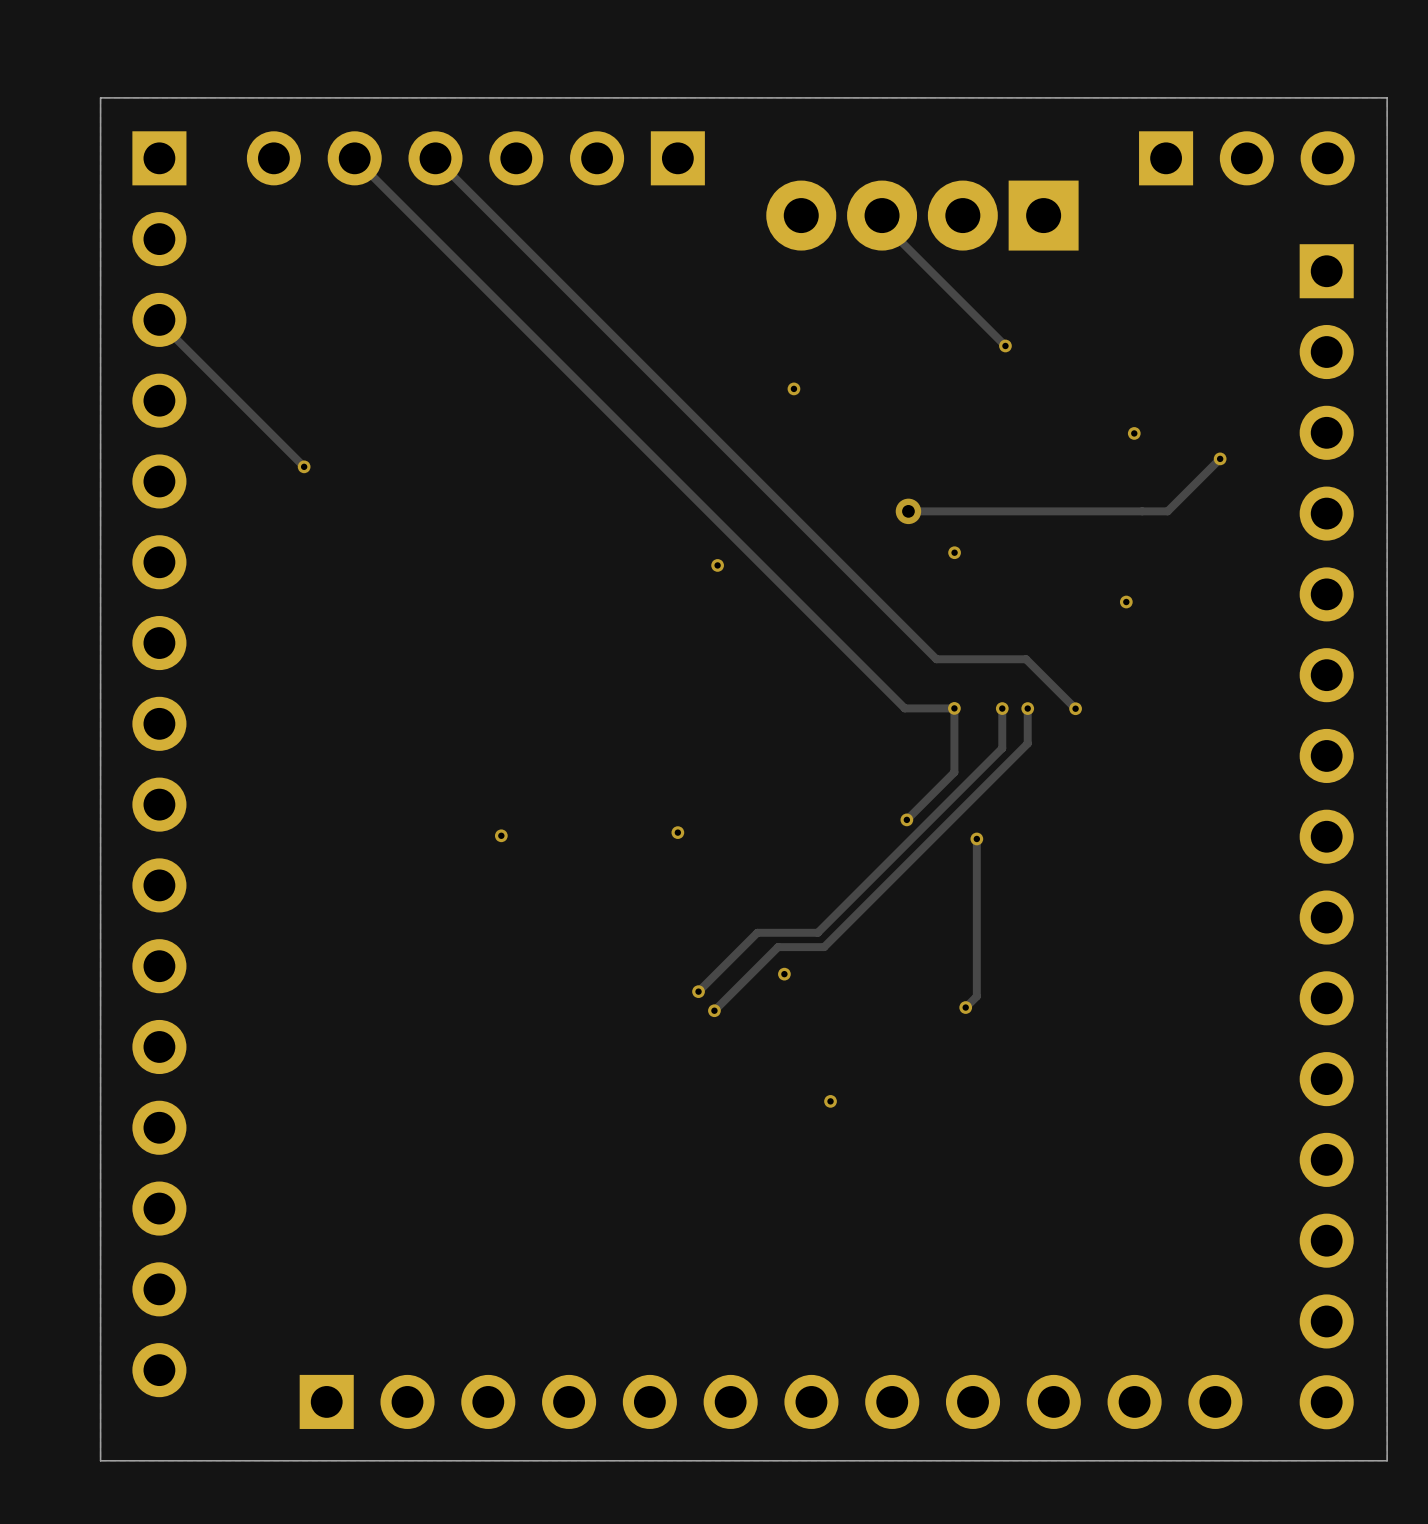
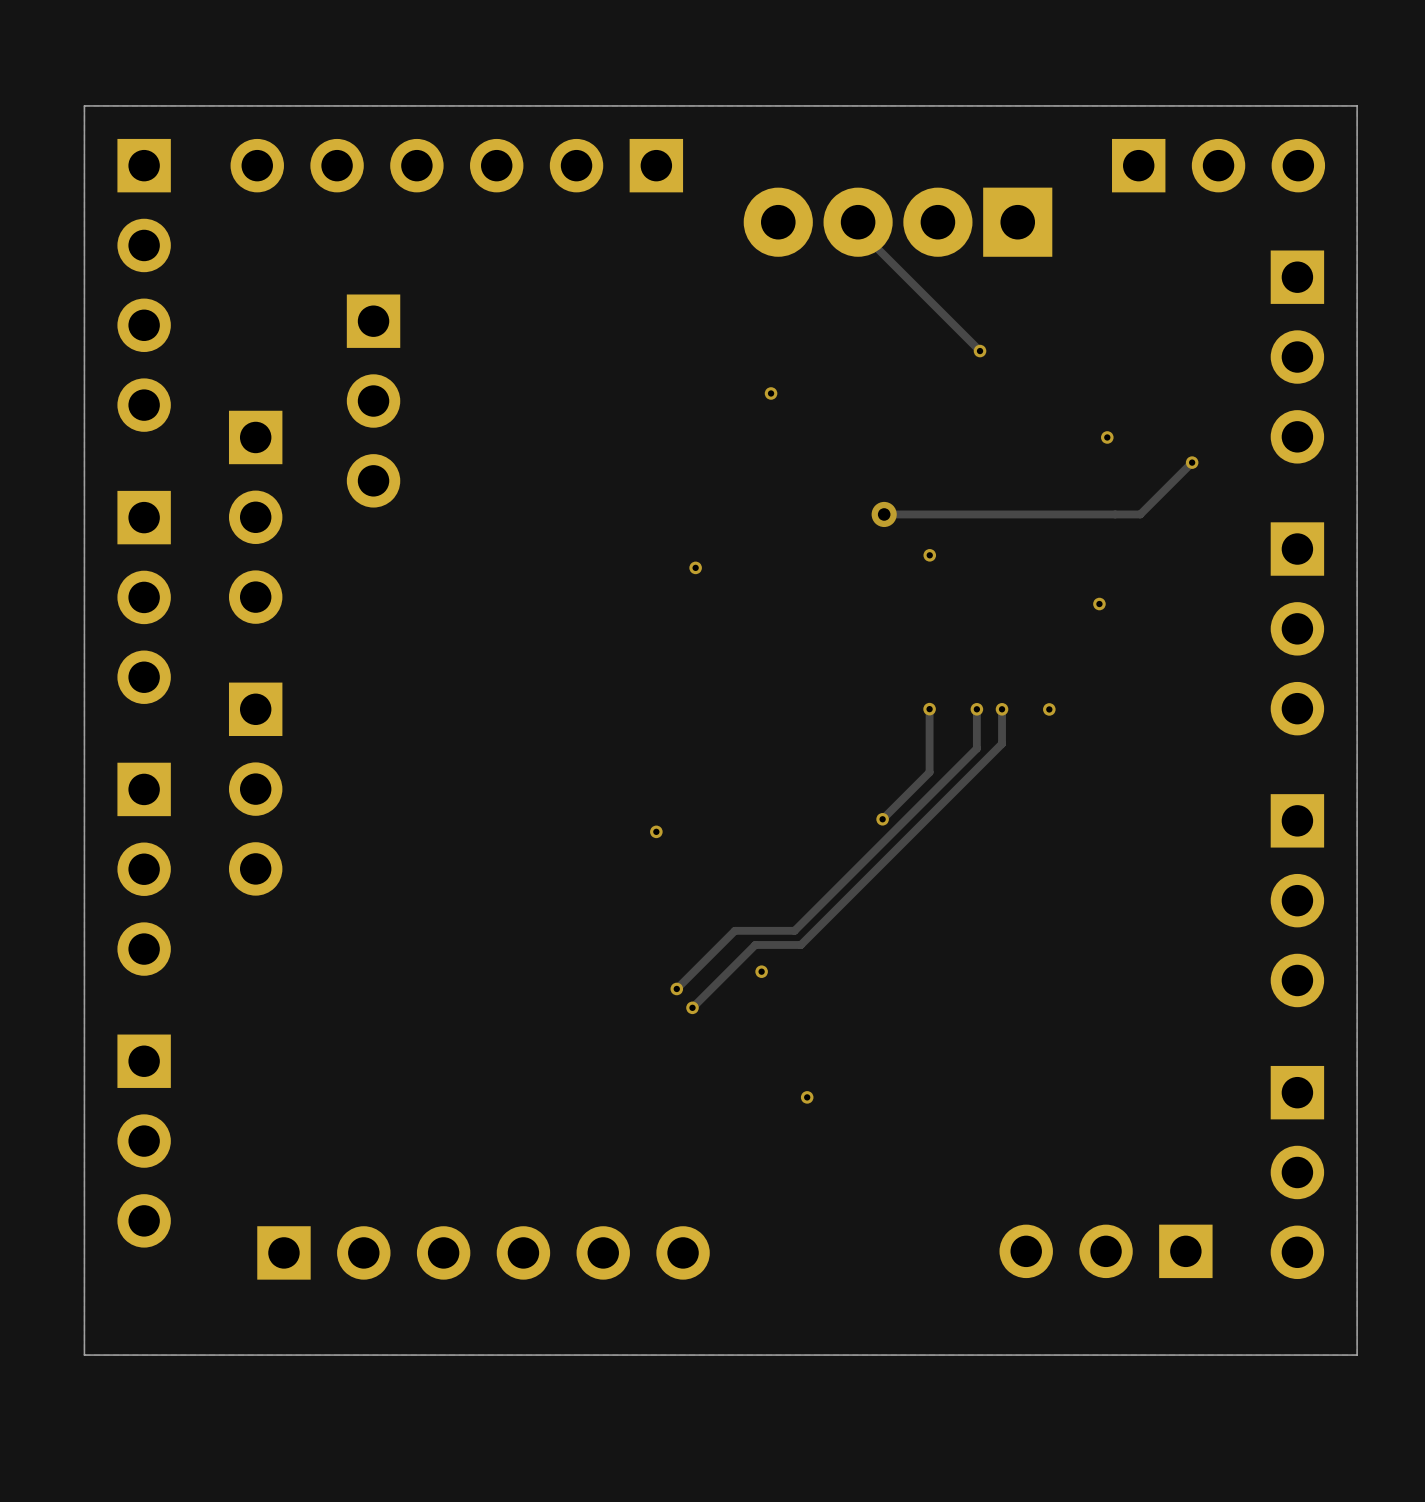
board edge: (100, 97) (100, 1460) (1387, 1460) (1387, 1362) -> (86, 105) (84, 105) (84, 1355) (1357, 1355)
track: (354, 158) (904, 708) (954, 708) -> none
track: (435, 158) (936, 659) (1026, 659) (1075, 708) -> none
part: none -> (144, 285)
track: (159, 319) (159, 322) (304, 466) -> none
part: none -> (373, 401)
via: (304, 466) -> none
part: none -> (255, 517)
part: none -> (144, 597)
part: none -> (1297, 628)
part: (159, 764) -> none
part: none -> (255, 789)
via: (501, 835) -> none
part: (1326, 836) -> none
track: (976, 838) (976, 996) (965, 1007) -> none
via: (976, 838) -> none
part: none -> (144, 869)
part: none -> (1297, 900)
via: (965, 1007) -> none
part: none -> (144, 1141)
part: none -> (1297, 1172)
part: none -> (1106, 1251)
part: none -> (483, 1252)
part: (771, 1401) -> none

